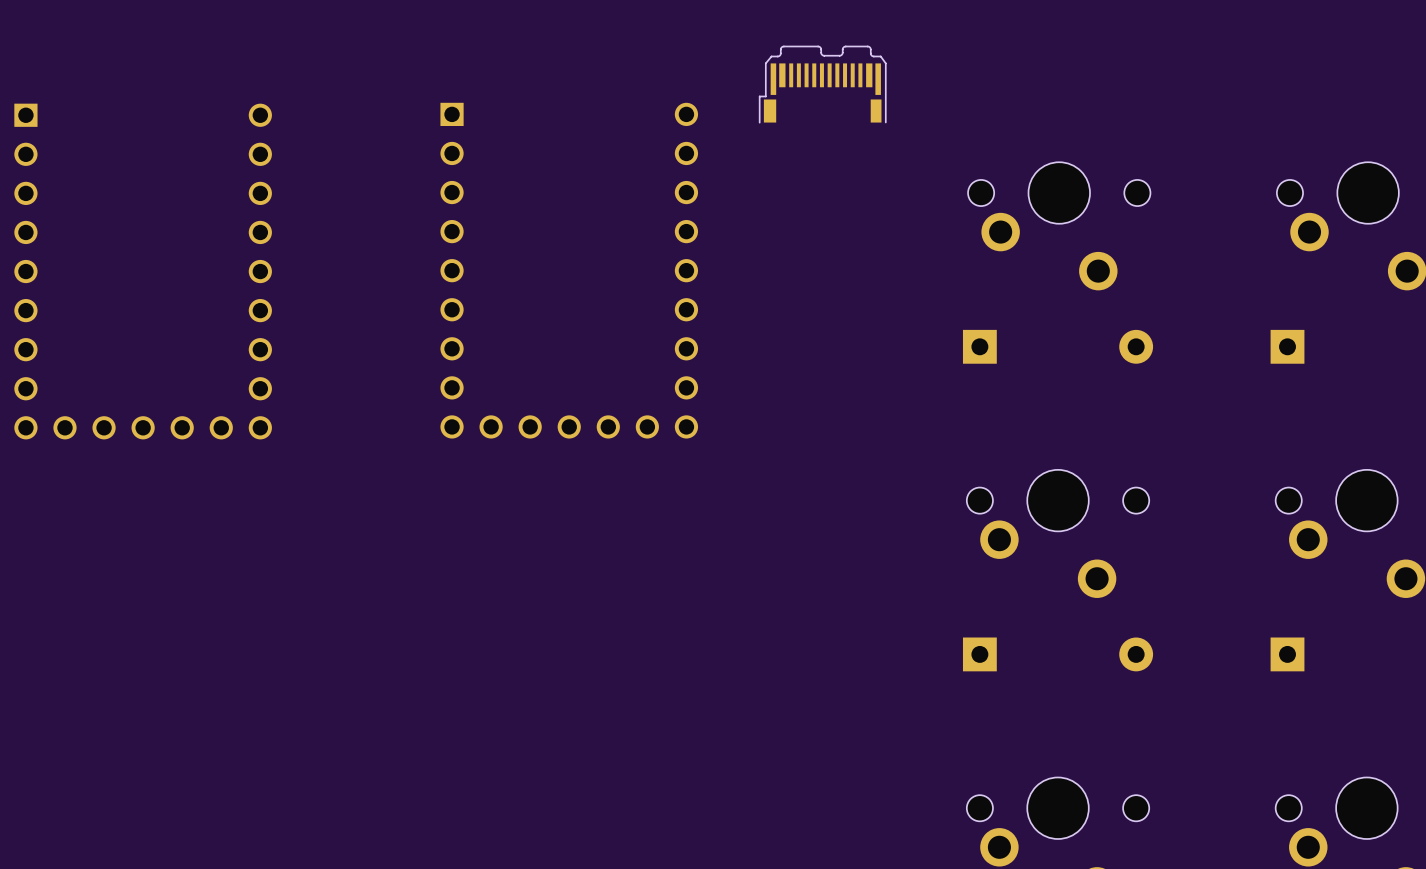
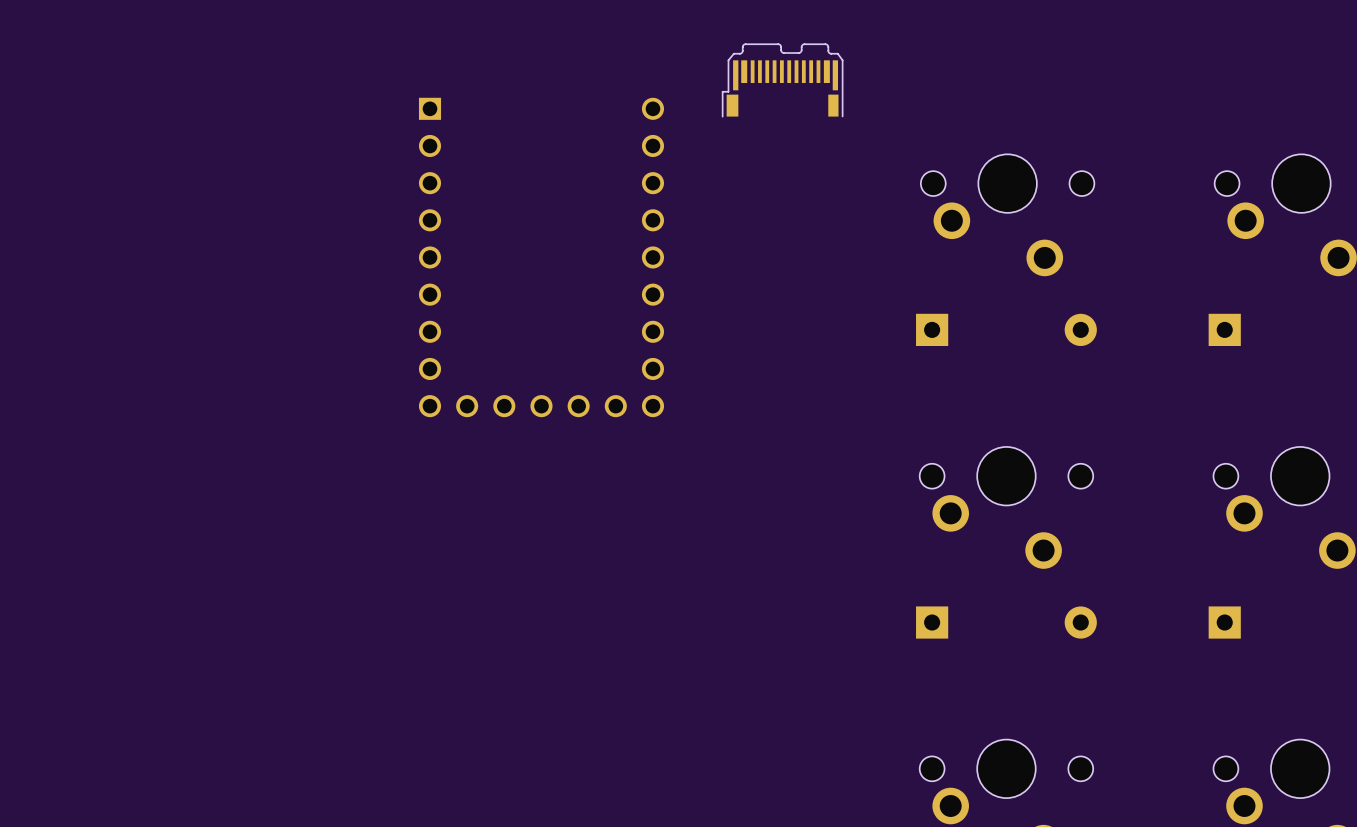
part: (143, 271) -> none

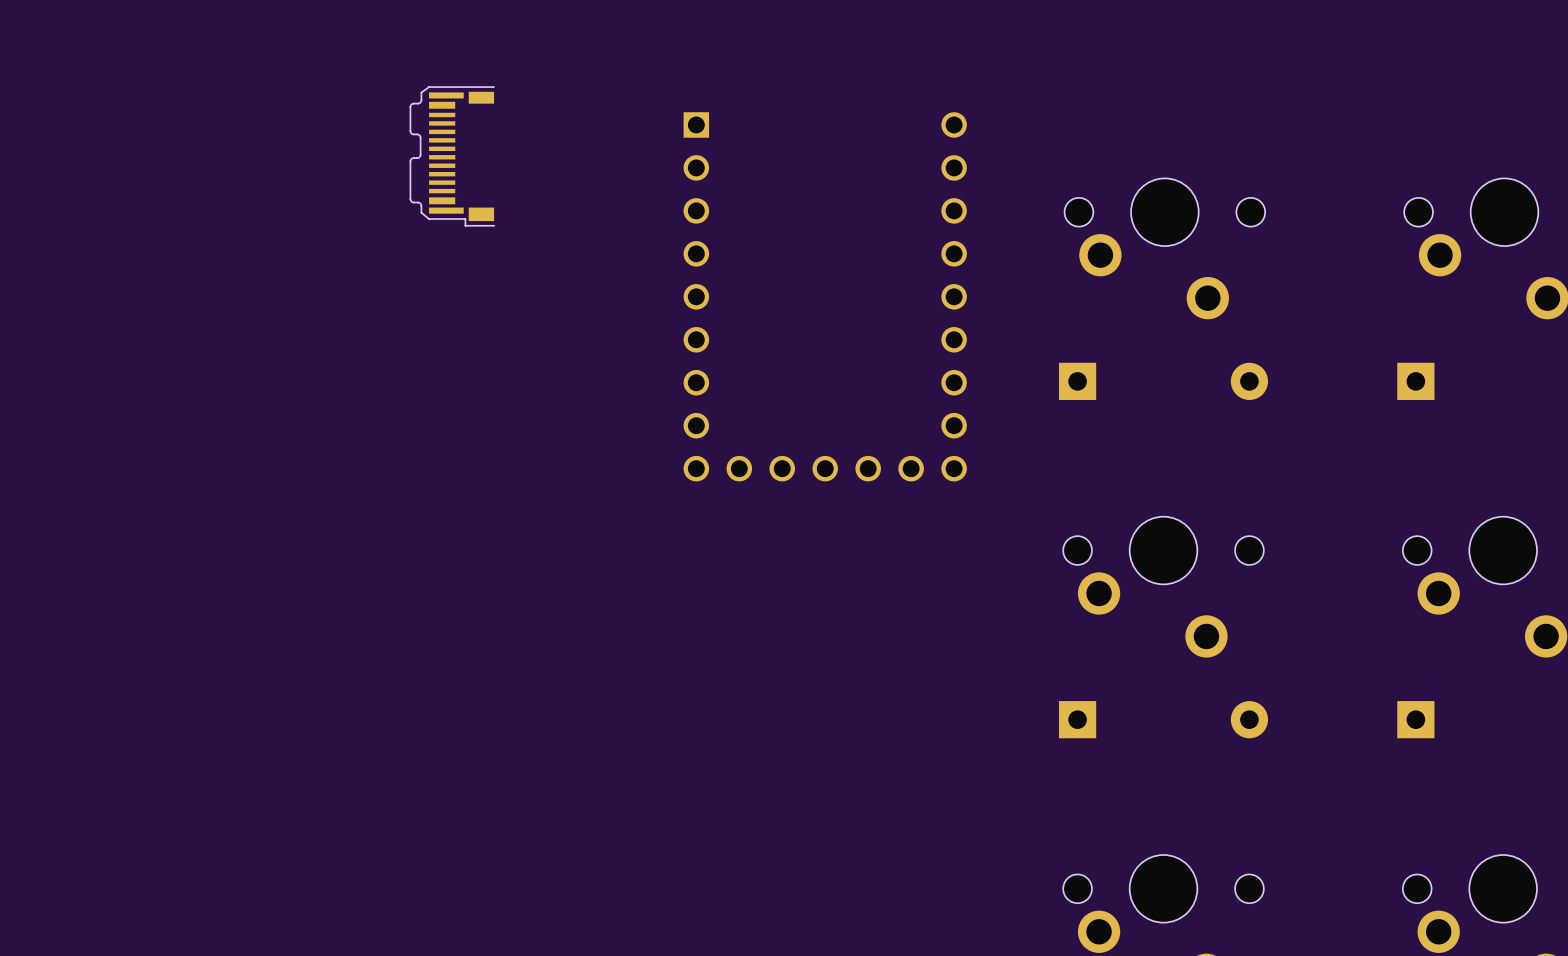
part: (782, 80) -> none
part: none -> (452, 156)
part position: (541, 257) -> (825, 296)

